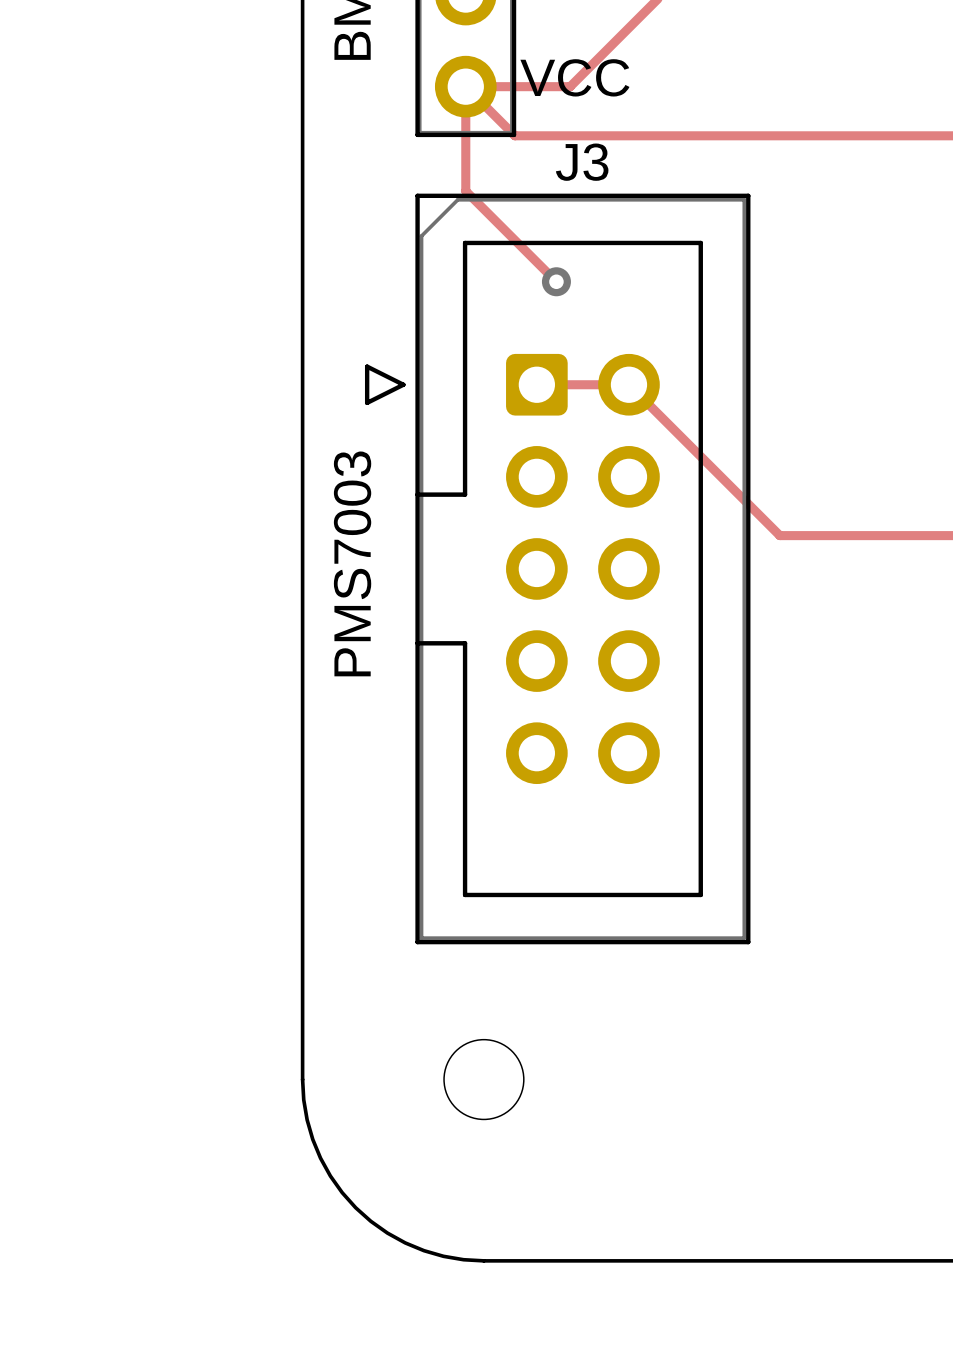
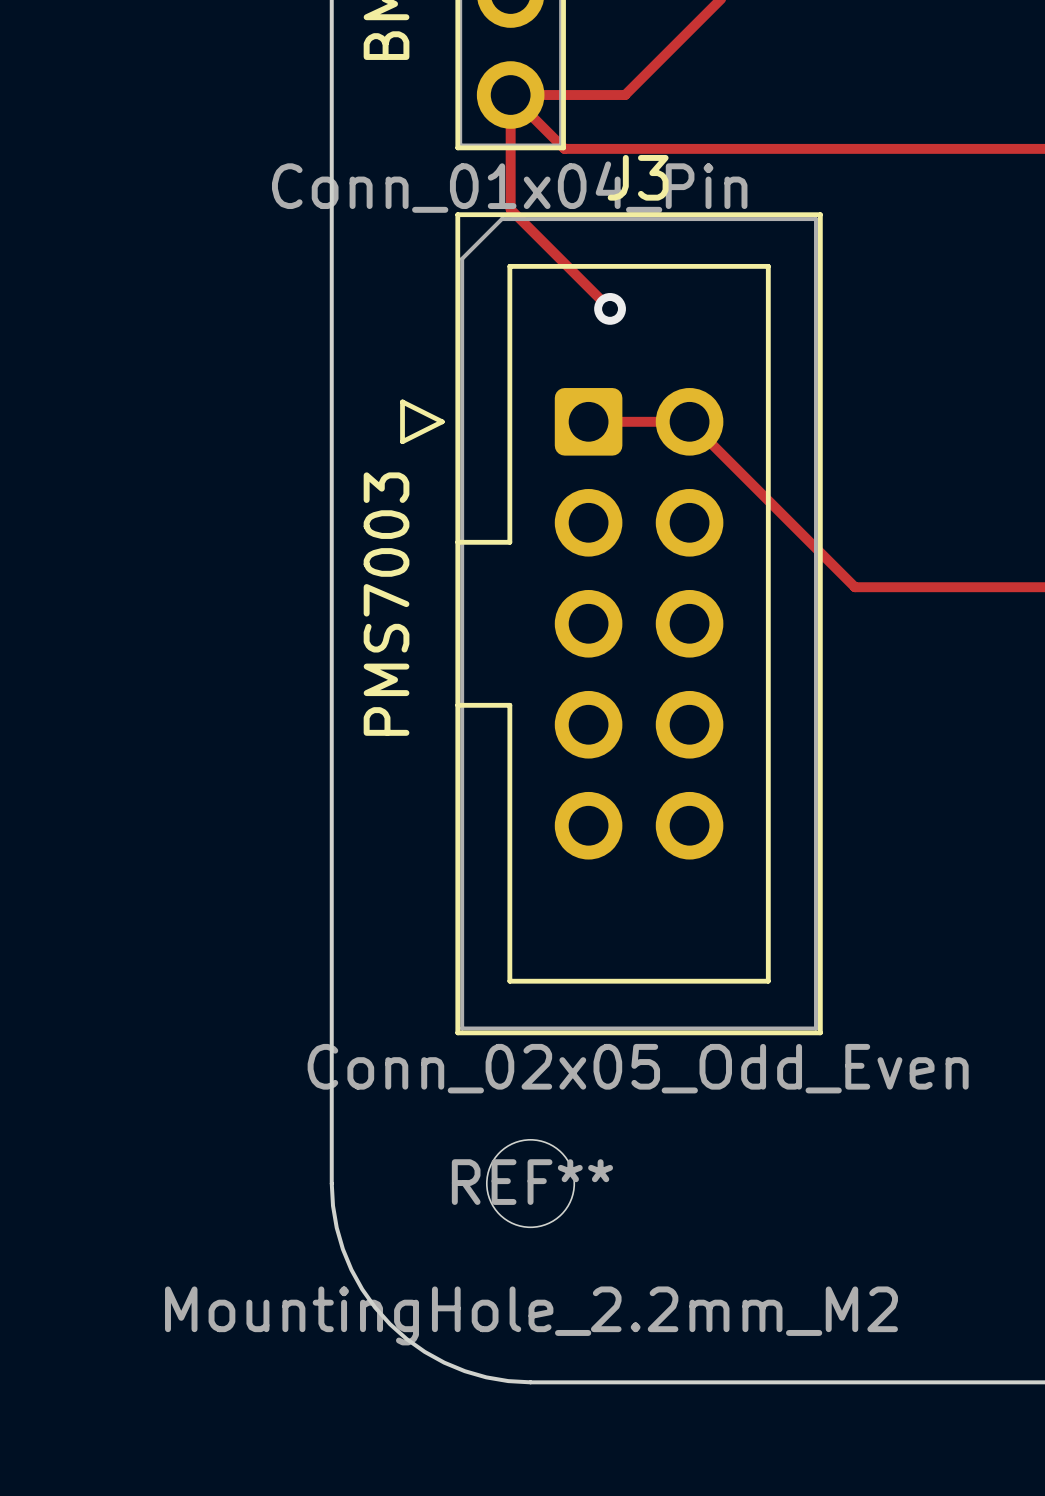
text: VCC (574, 77) -> none
part value: none -> Conn_01x04_Pin (509, 187)
J3 value: none -> Conn_02x05_Odd_Even (638, 1068)
REF** name: none -> REF** (532, 1182)
REF** value: none -> MountingHole_2.2mm_M2 (531, 1315)

